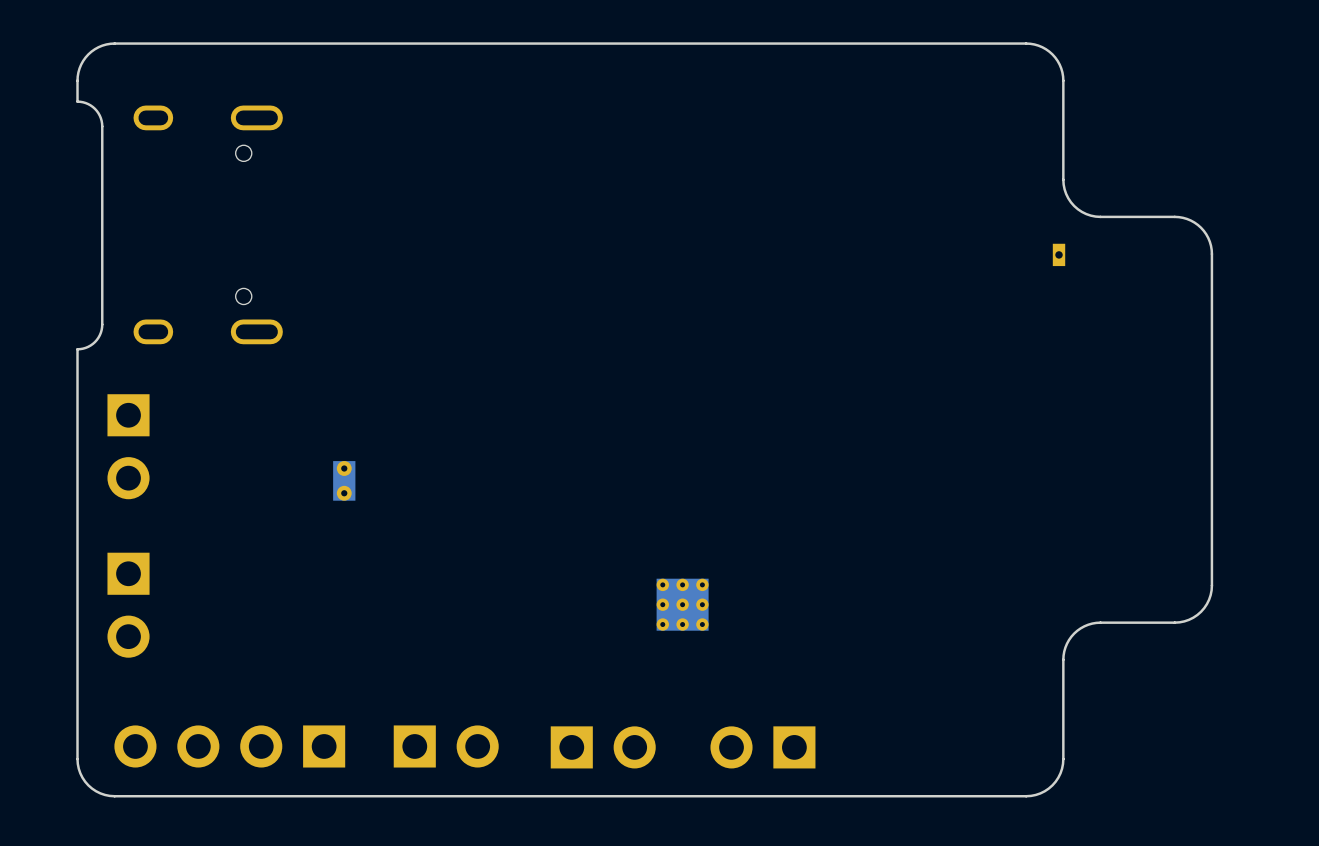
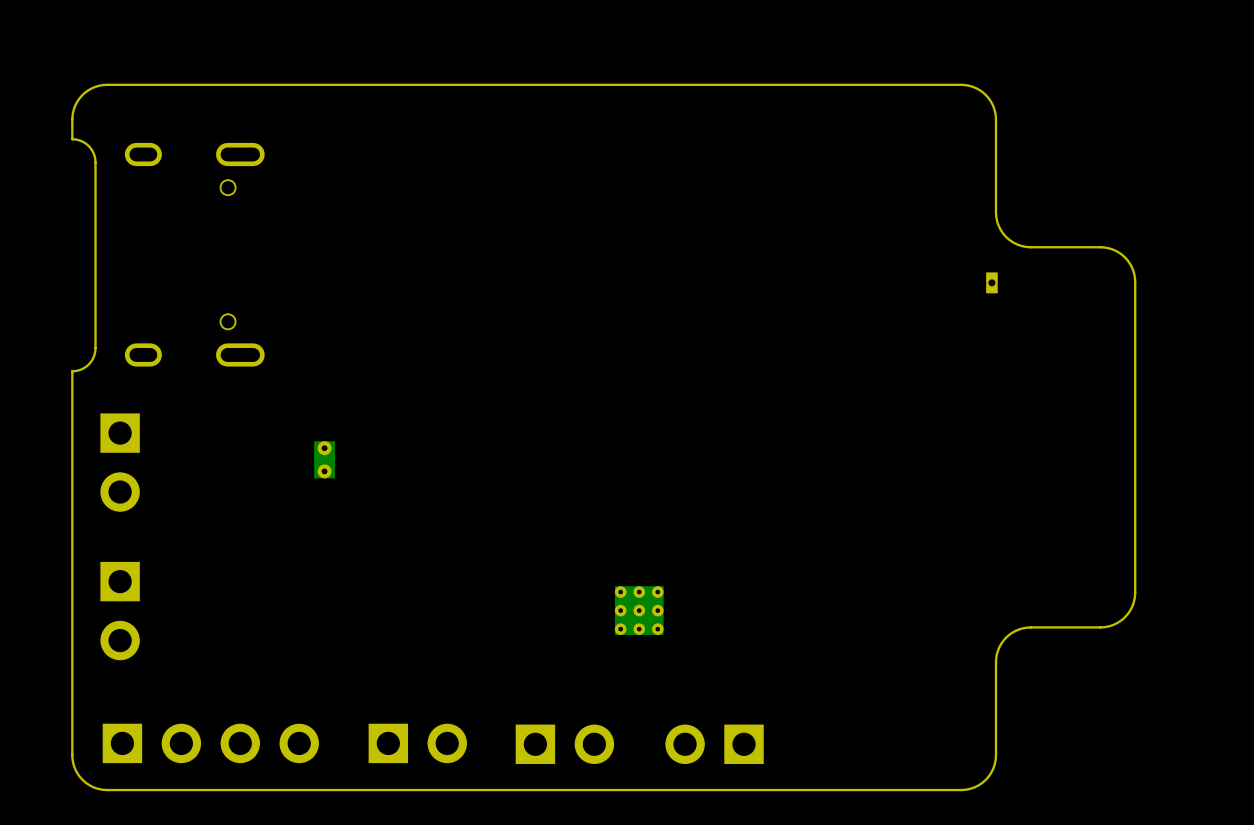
part position: (344, 480) -> (324, 459)
part rotation: 0° (229, 746) -> 180° (210, 743)

